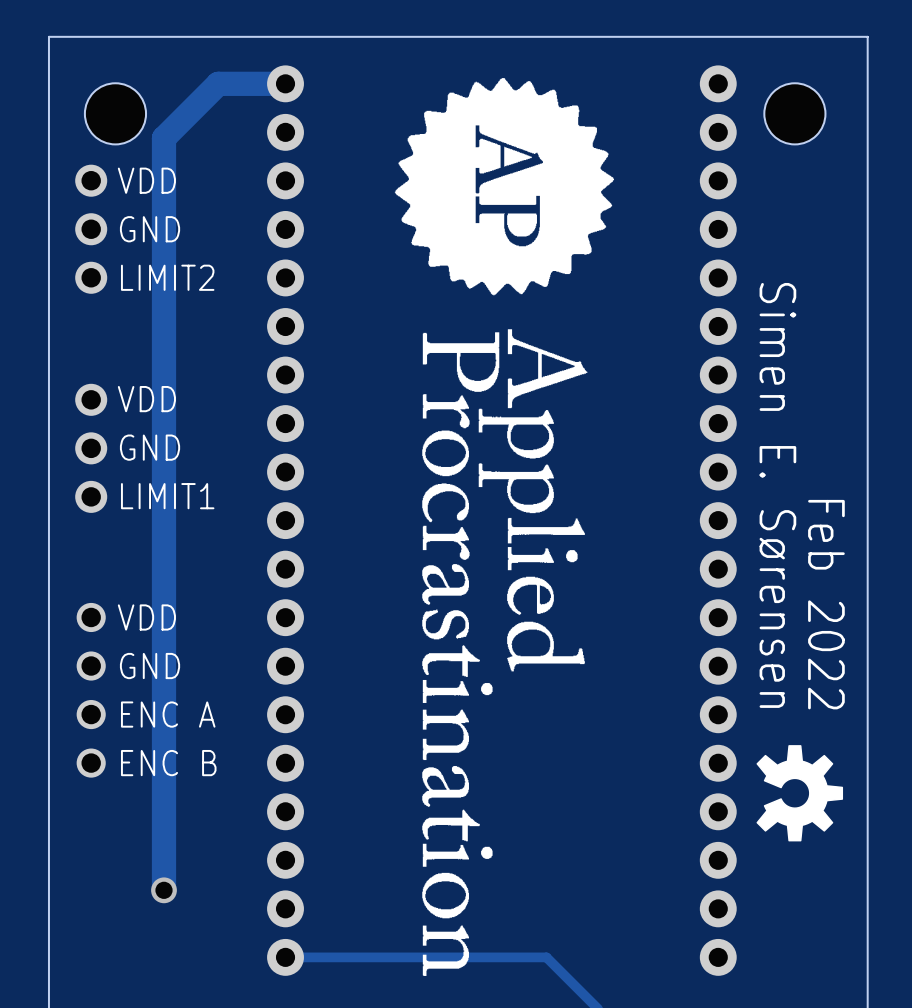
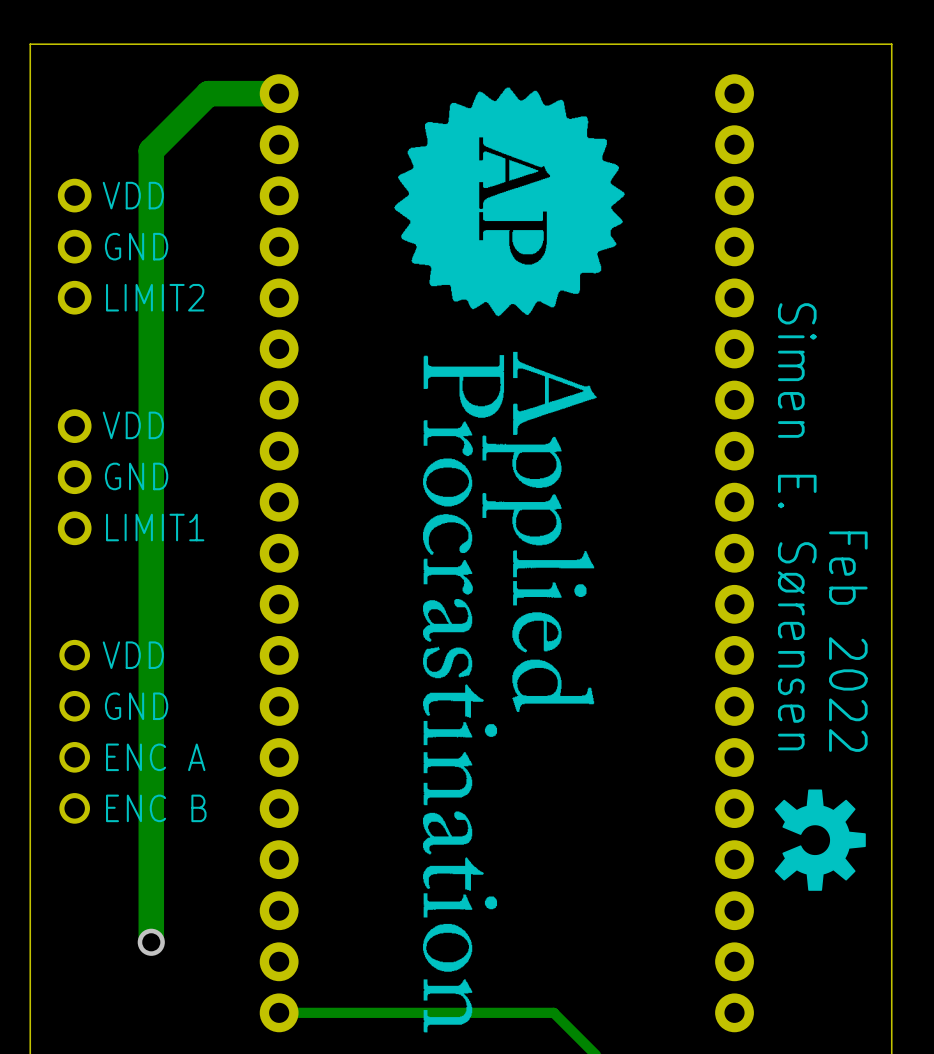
hole: (115, 113) -> none
hole: (794, 113) -> none

